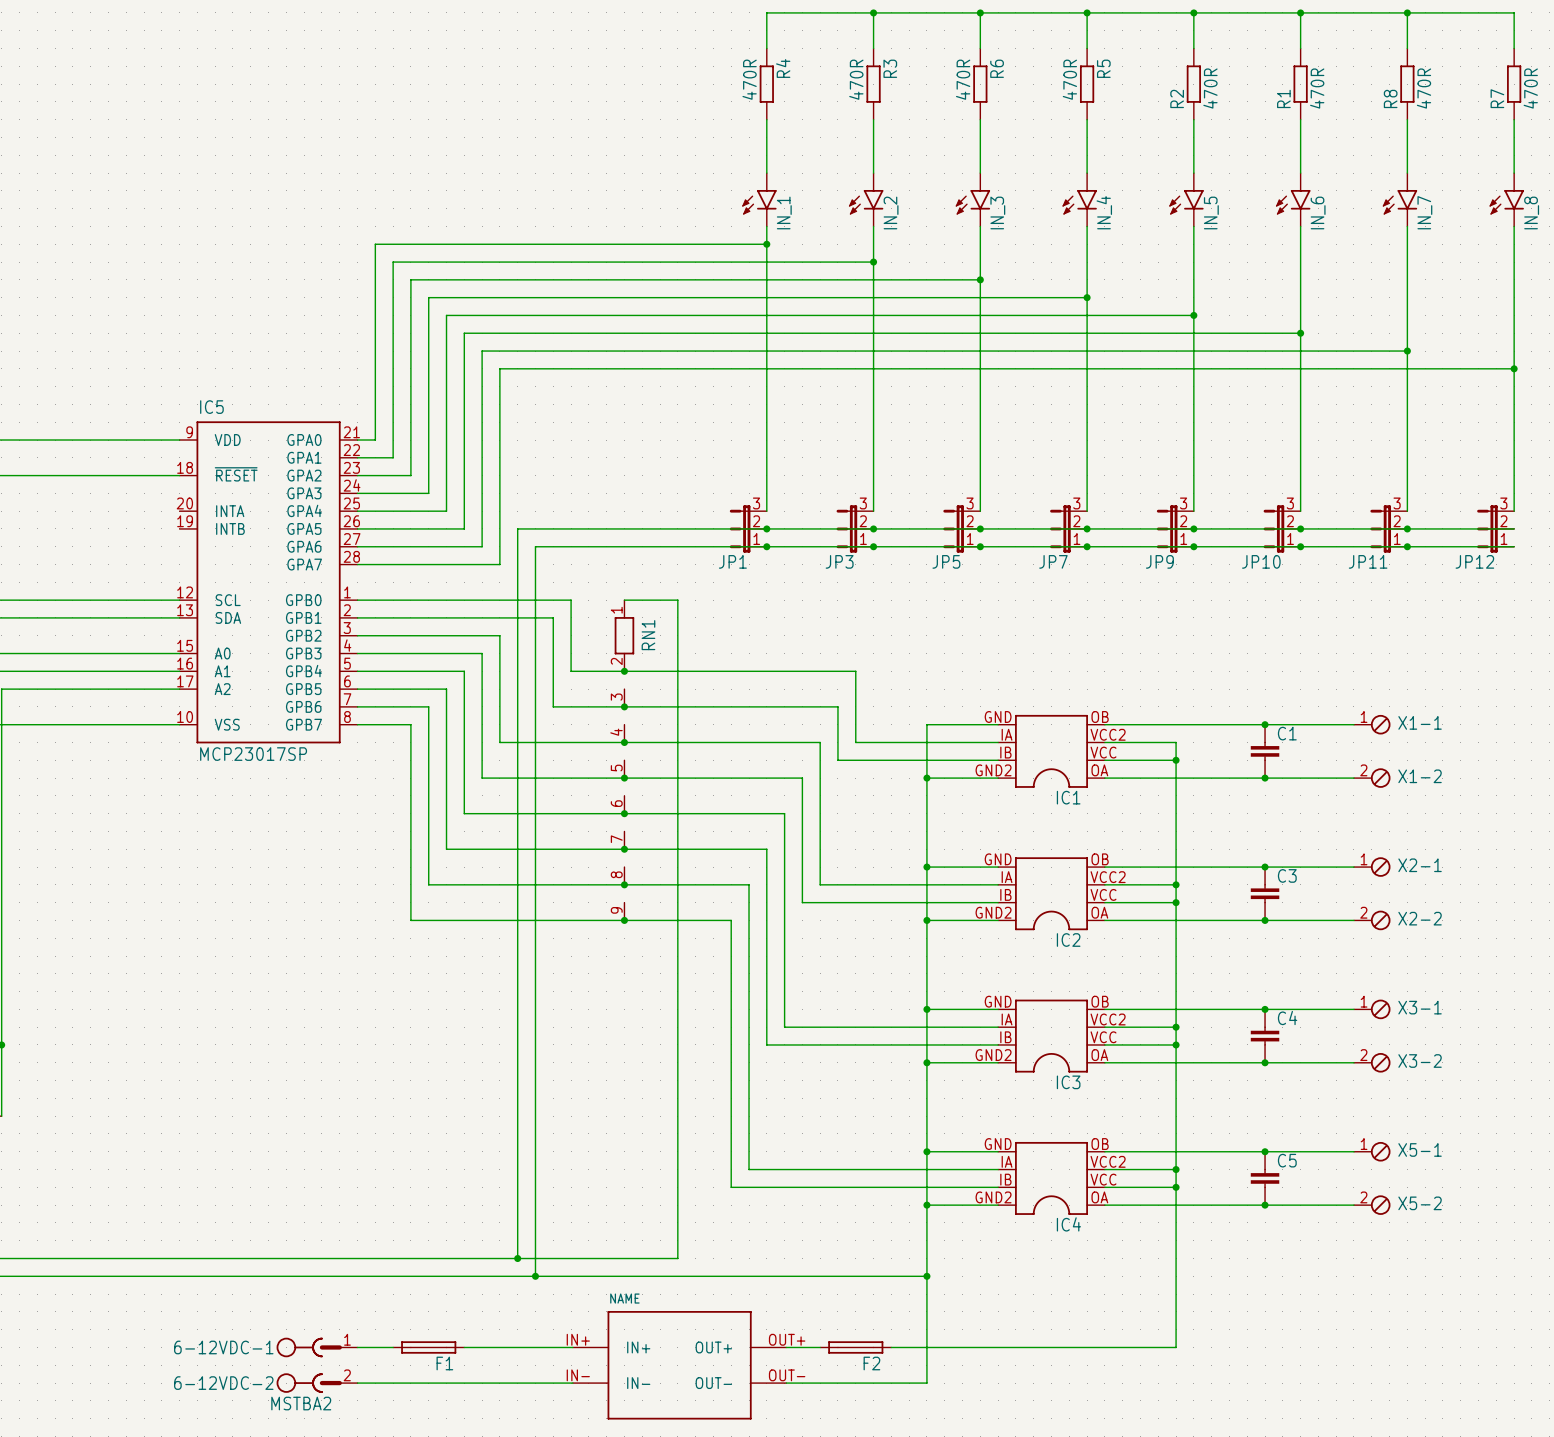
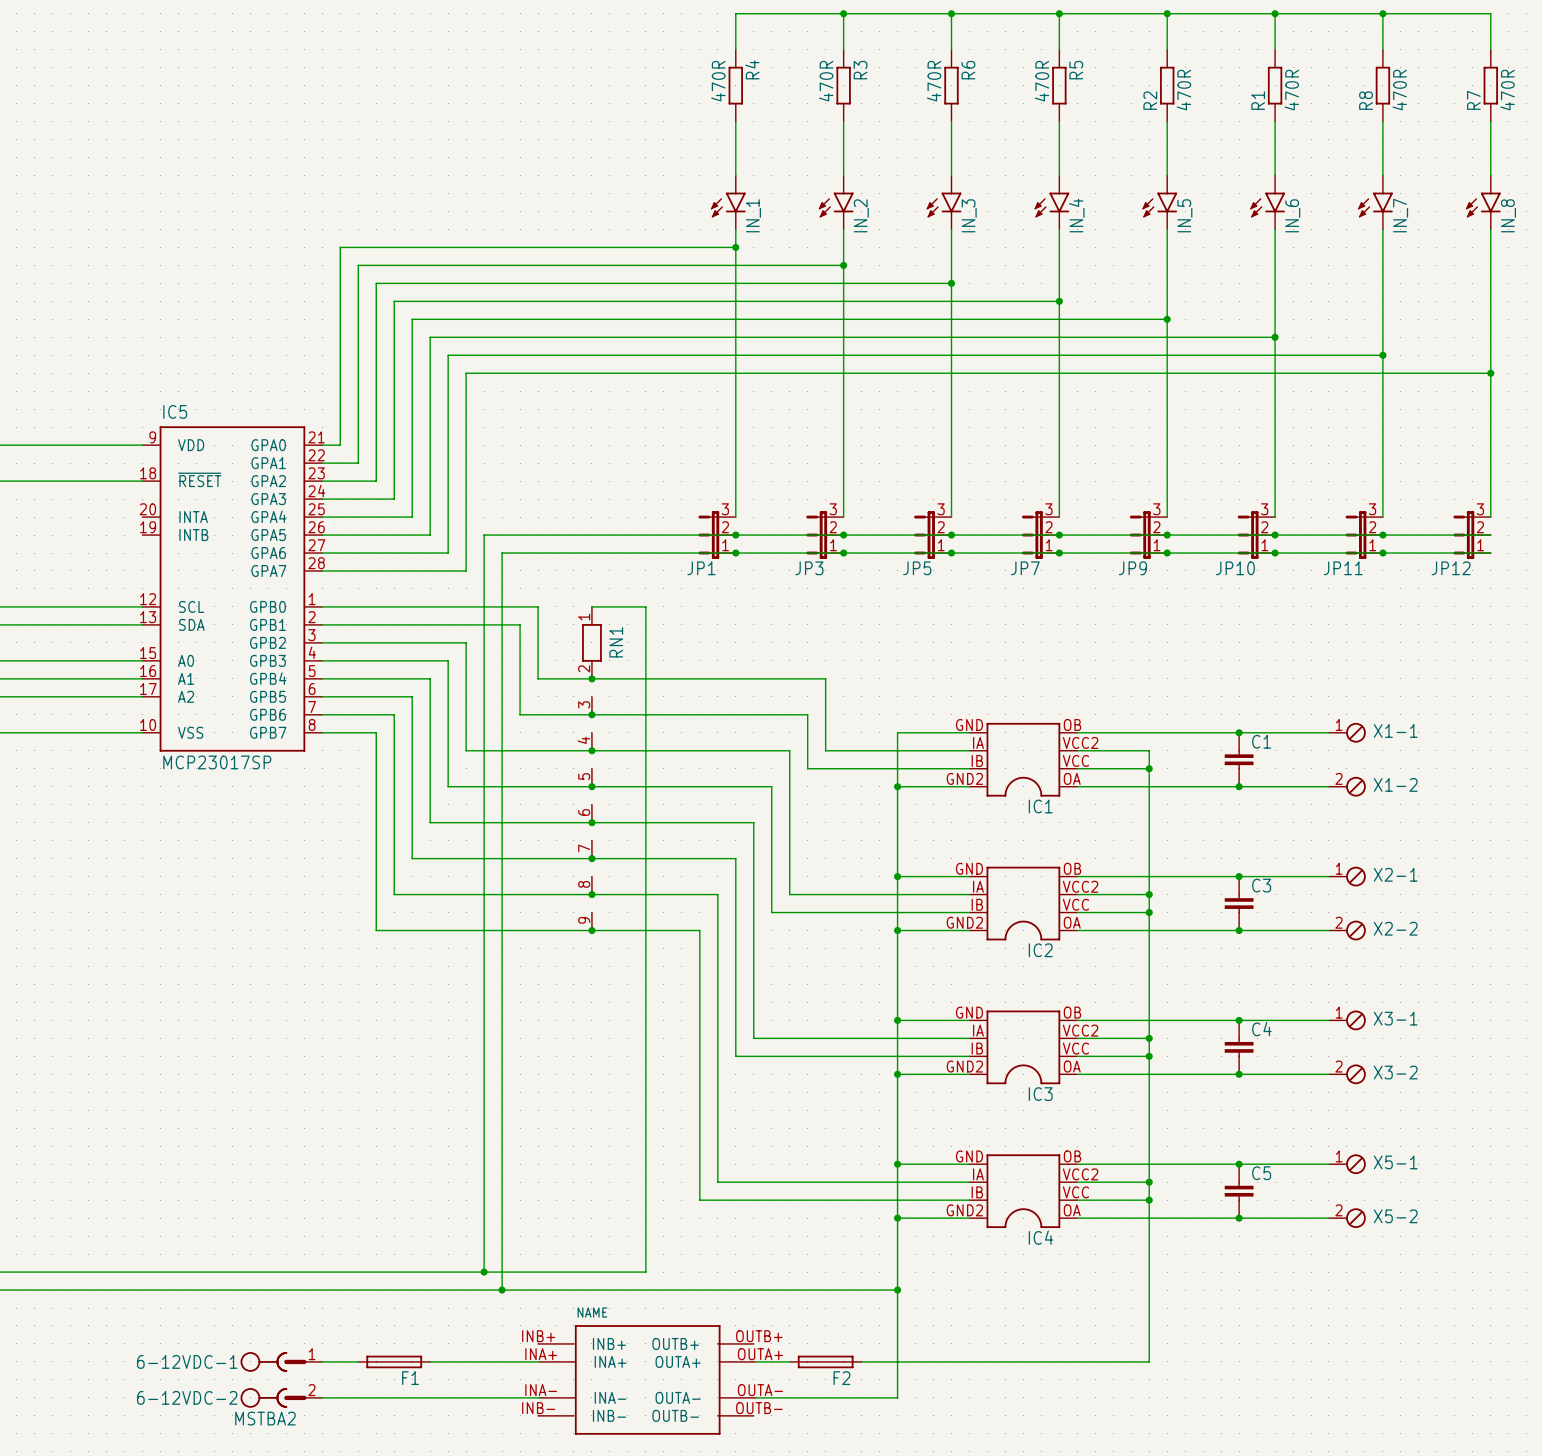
part symbol: [572, 1311, 787, 1420] -> [538, 1325, 756, 1435]

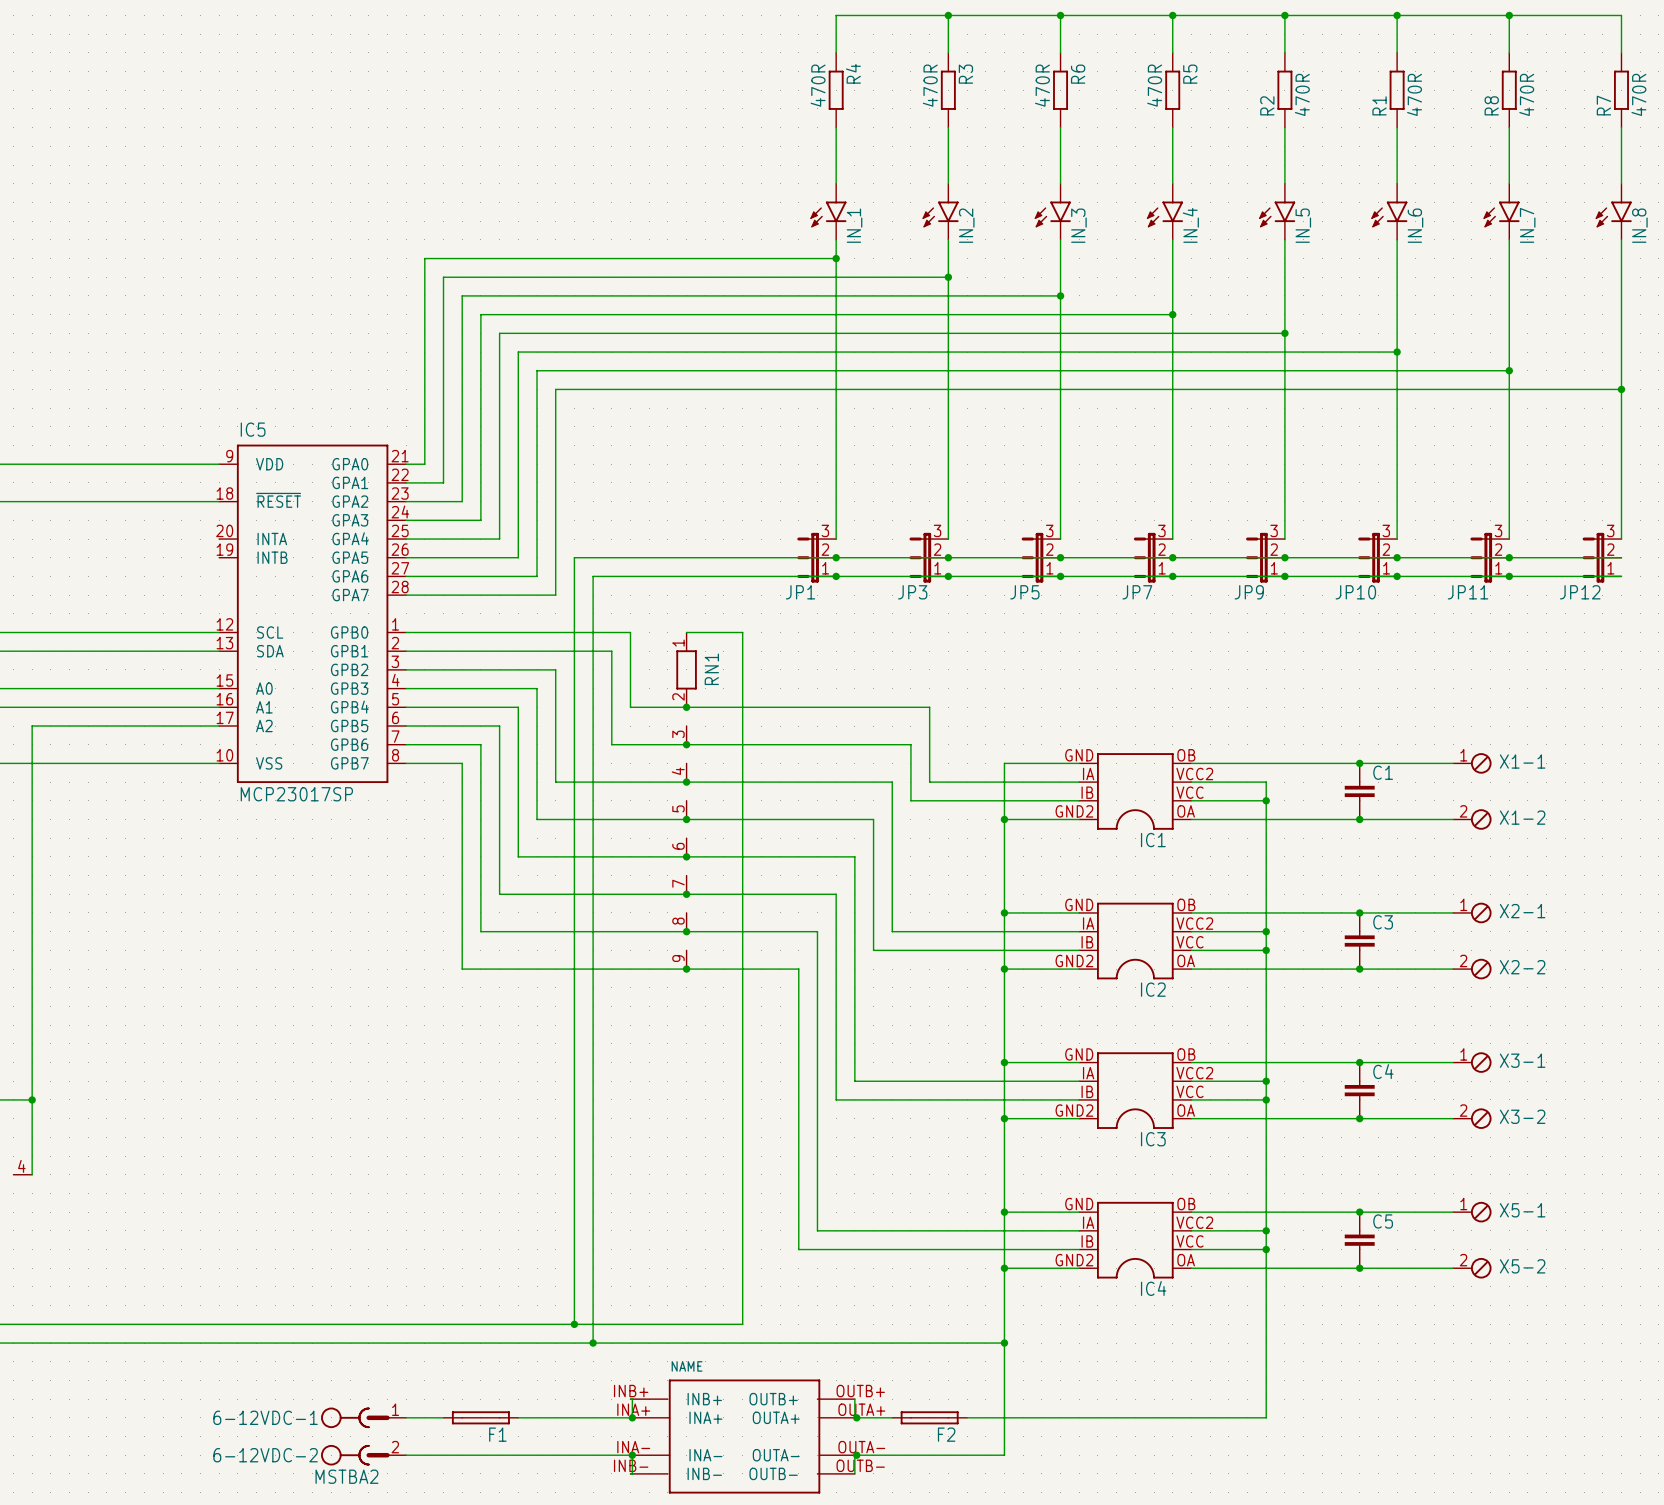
wire: none -> (630, 1399) (632, 1399) (632, 1417)
wire: none -> (854, 1399) (854, 1417) (856, 1417)
junction: none -> (632, 1417)
junction: none -> (856, 1417)
wire: none -> (632, 1455) (632, 1473) (630, 1473)
junction: none -> (632, 1455)
wire: none -> (856, 1455) (854, 1455) (854, 1473)
junction: none -> (856, 1455)

